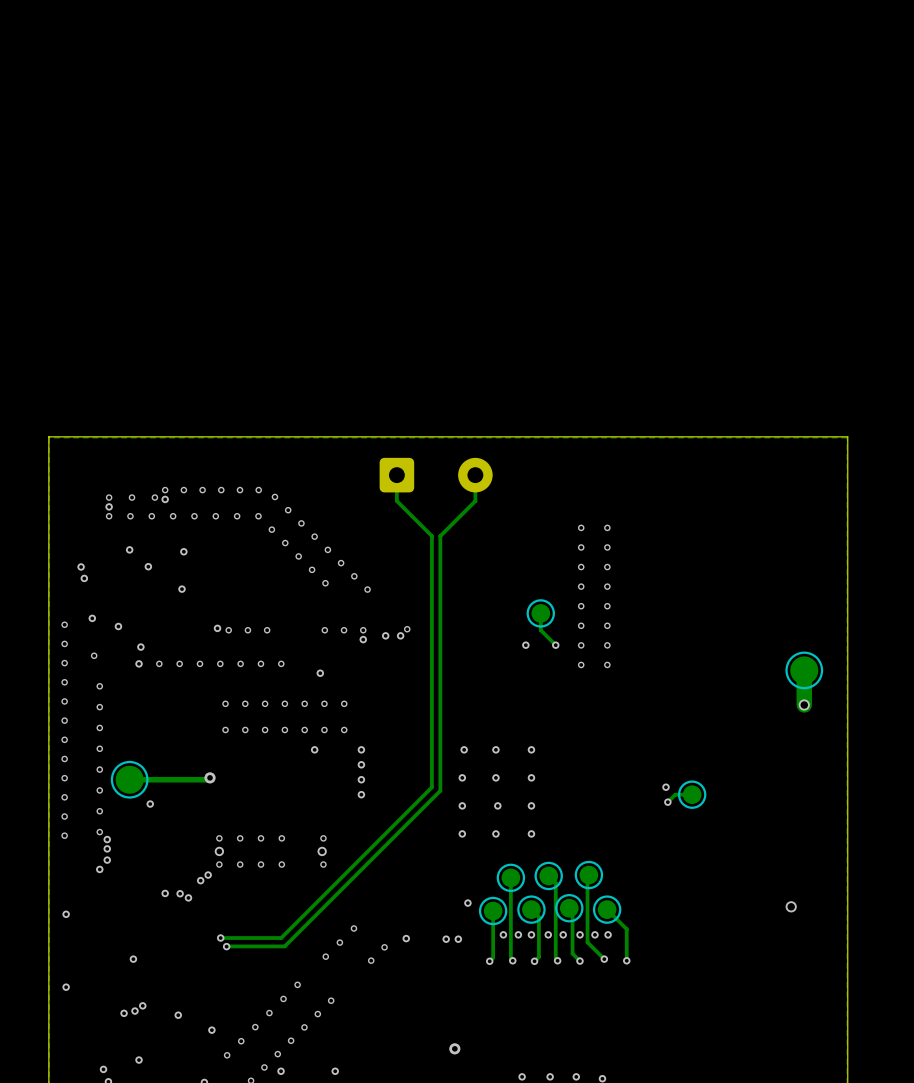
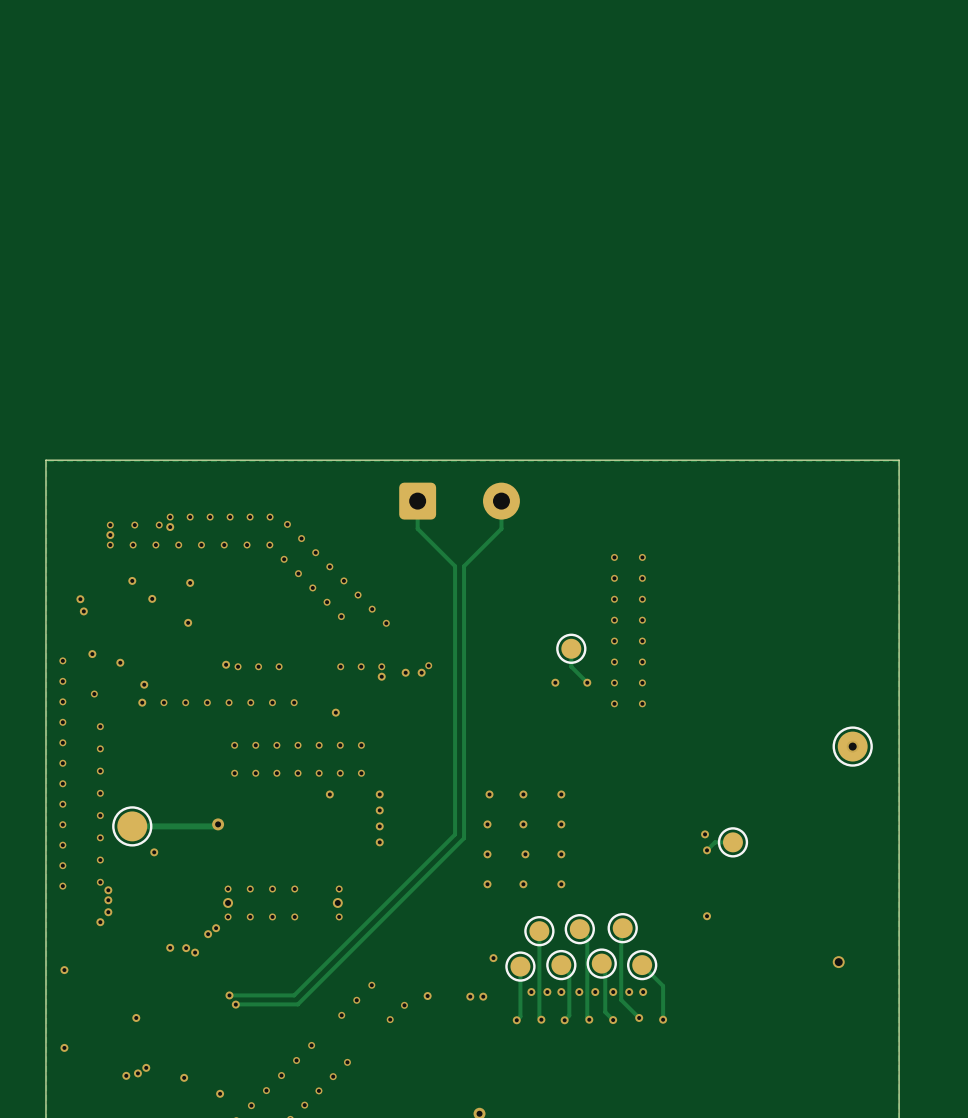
track: (804, 670) (804, 704) -> none
part position: (804, 670) -> (852, 746)
via: none -> (707, 916)

